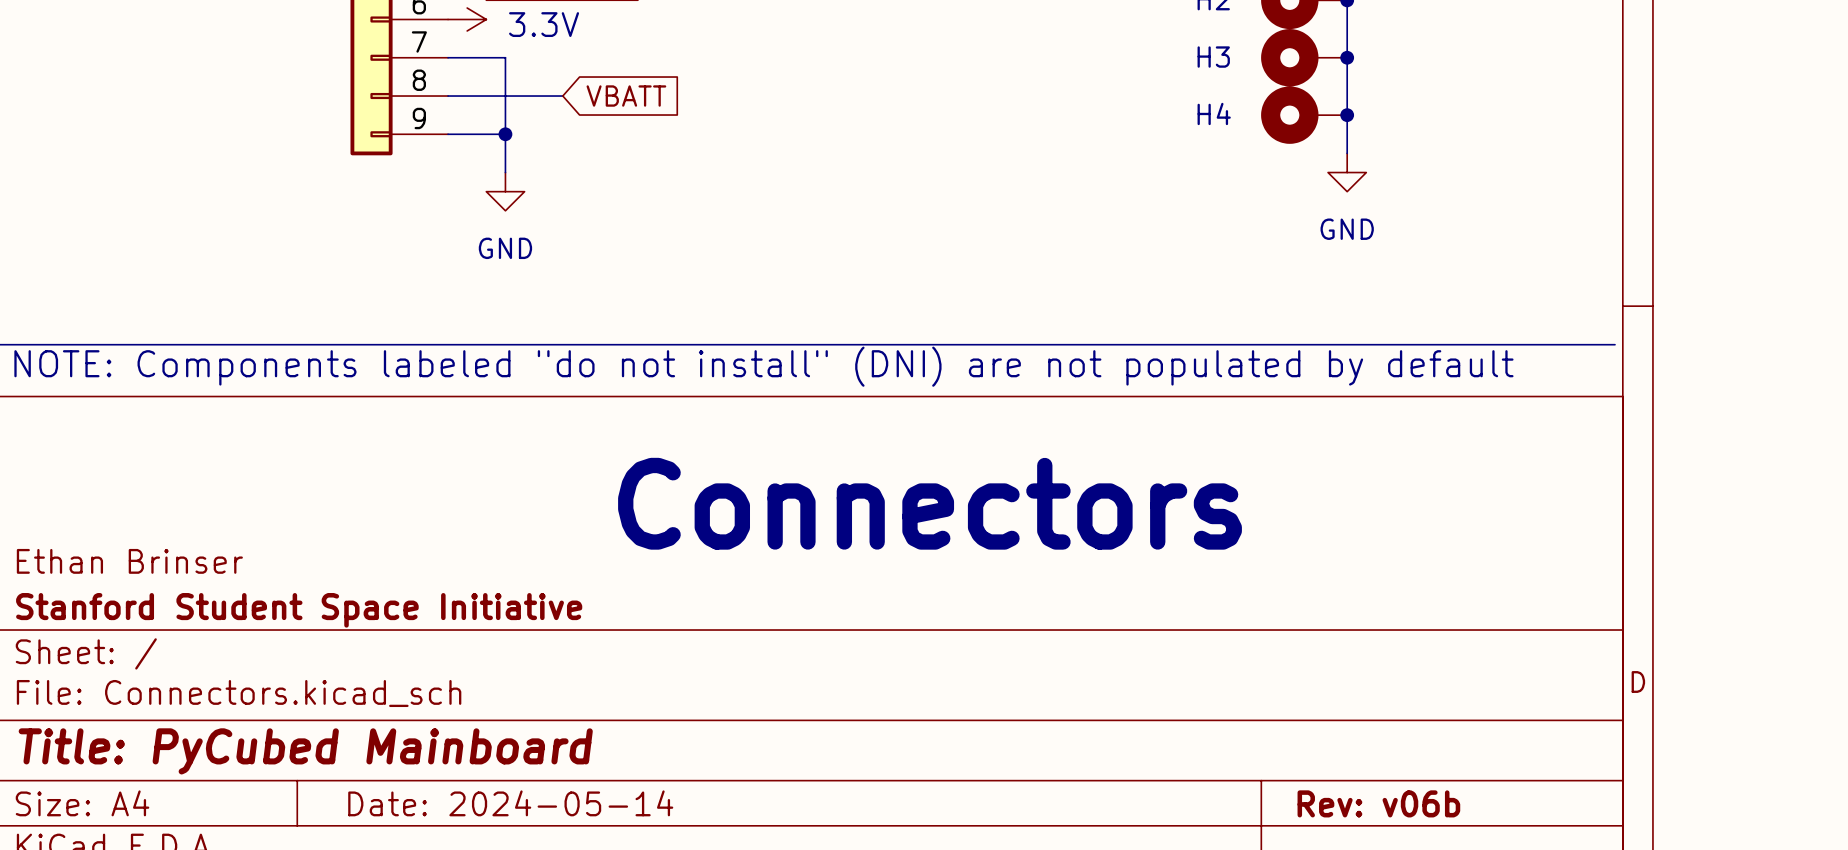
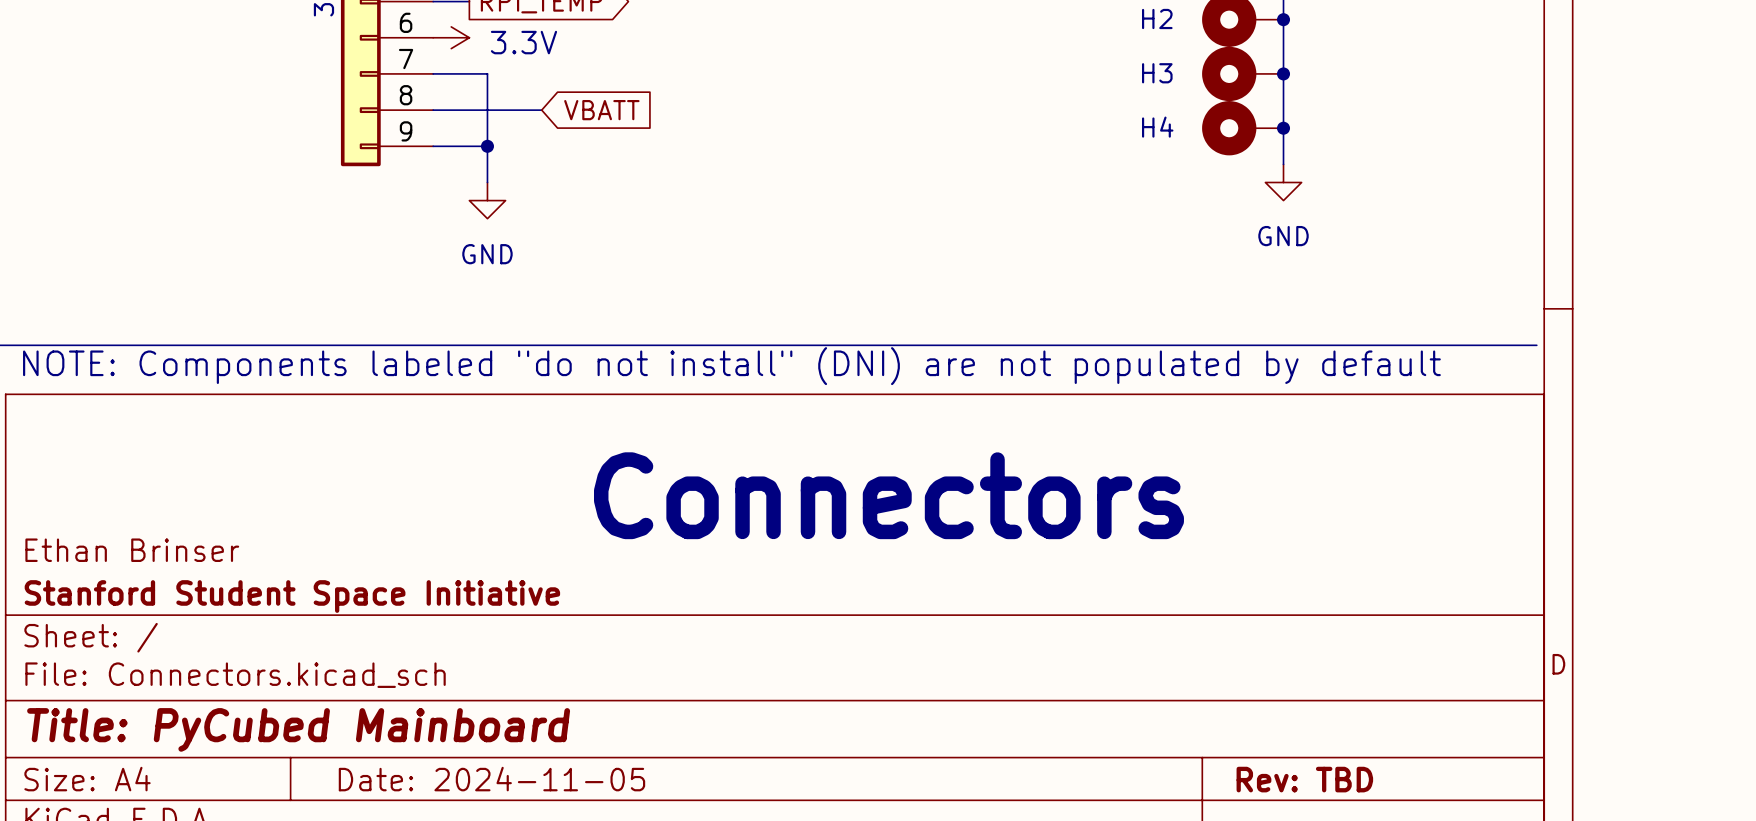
title block: Date: 2024-05-14 (510, 803) -> Date: 2024-11-05 (491, 779)
title block: Rev: v06b (1378, 803) -> Rev: TBD (1304, 779)

